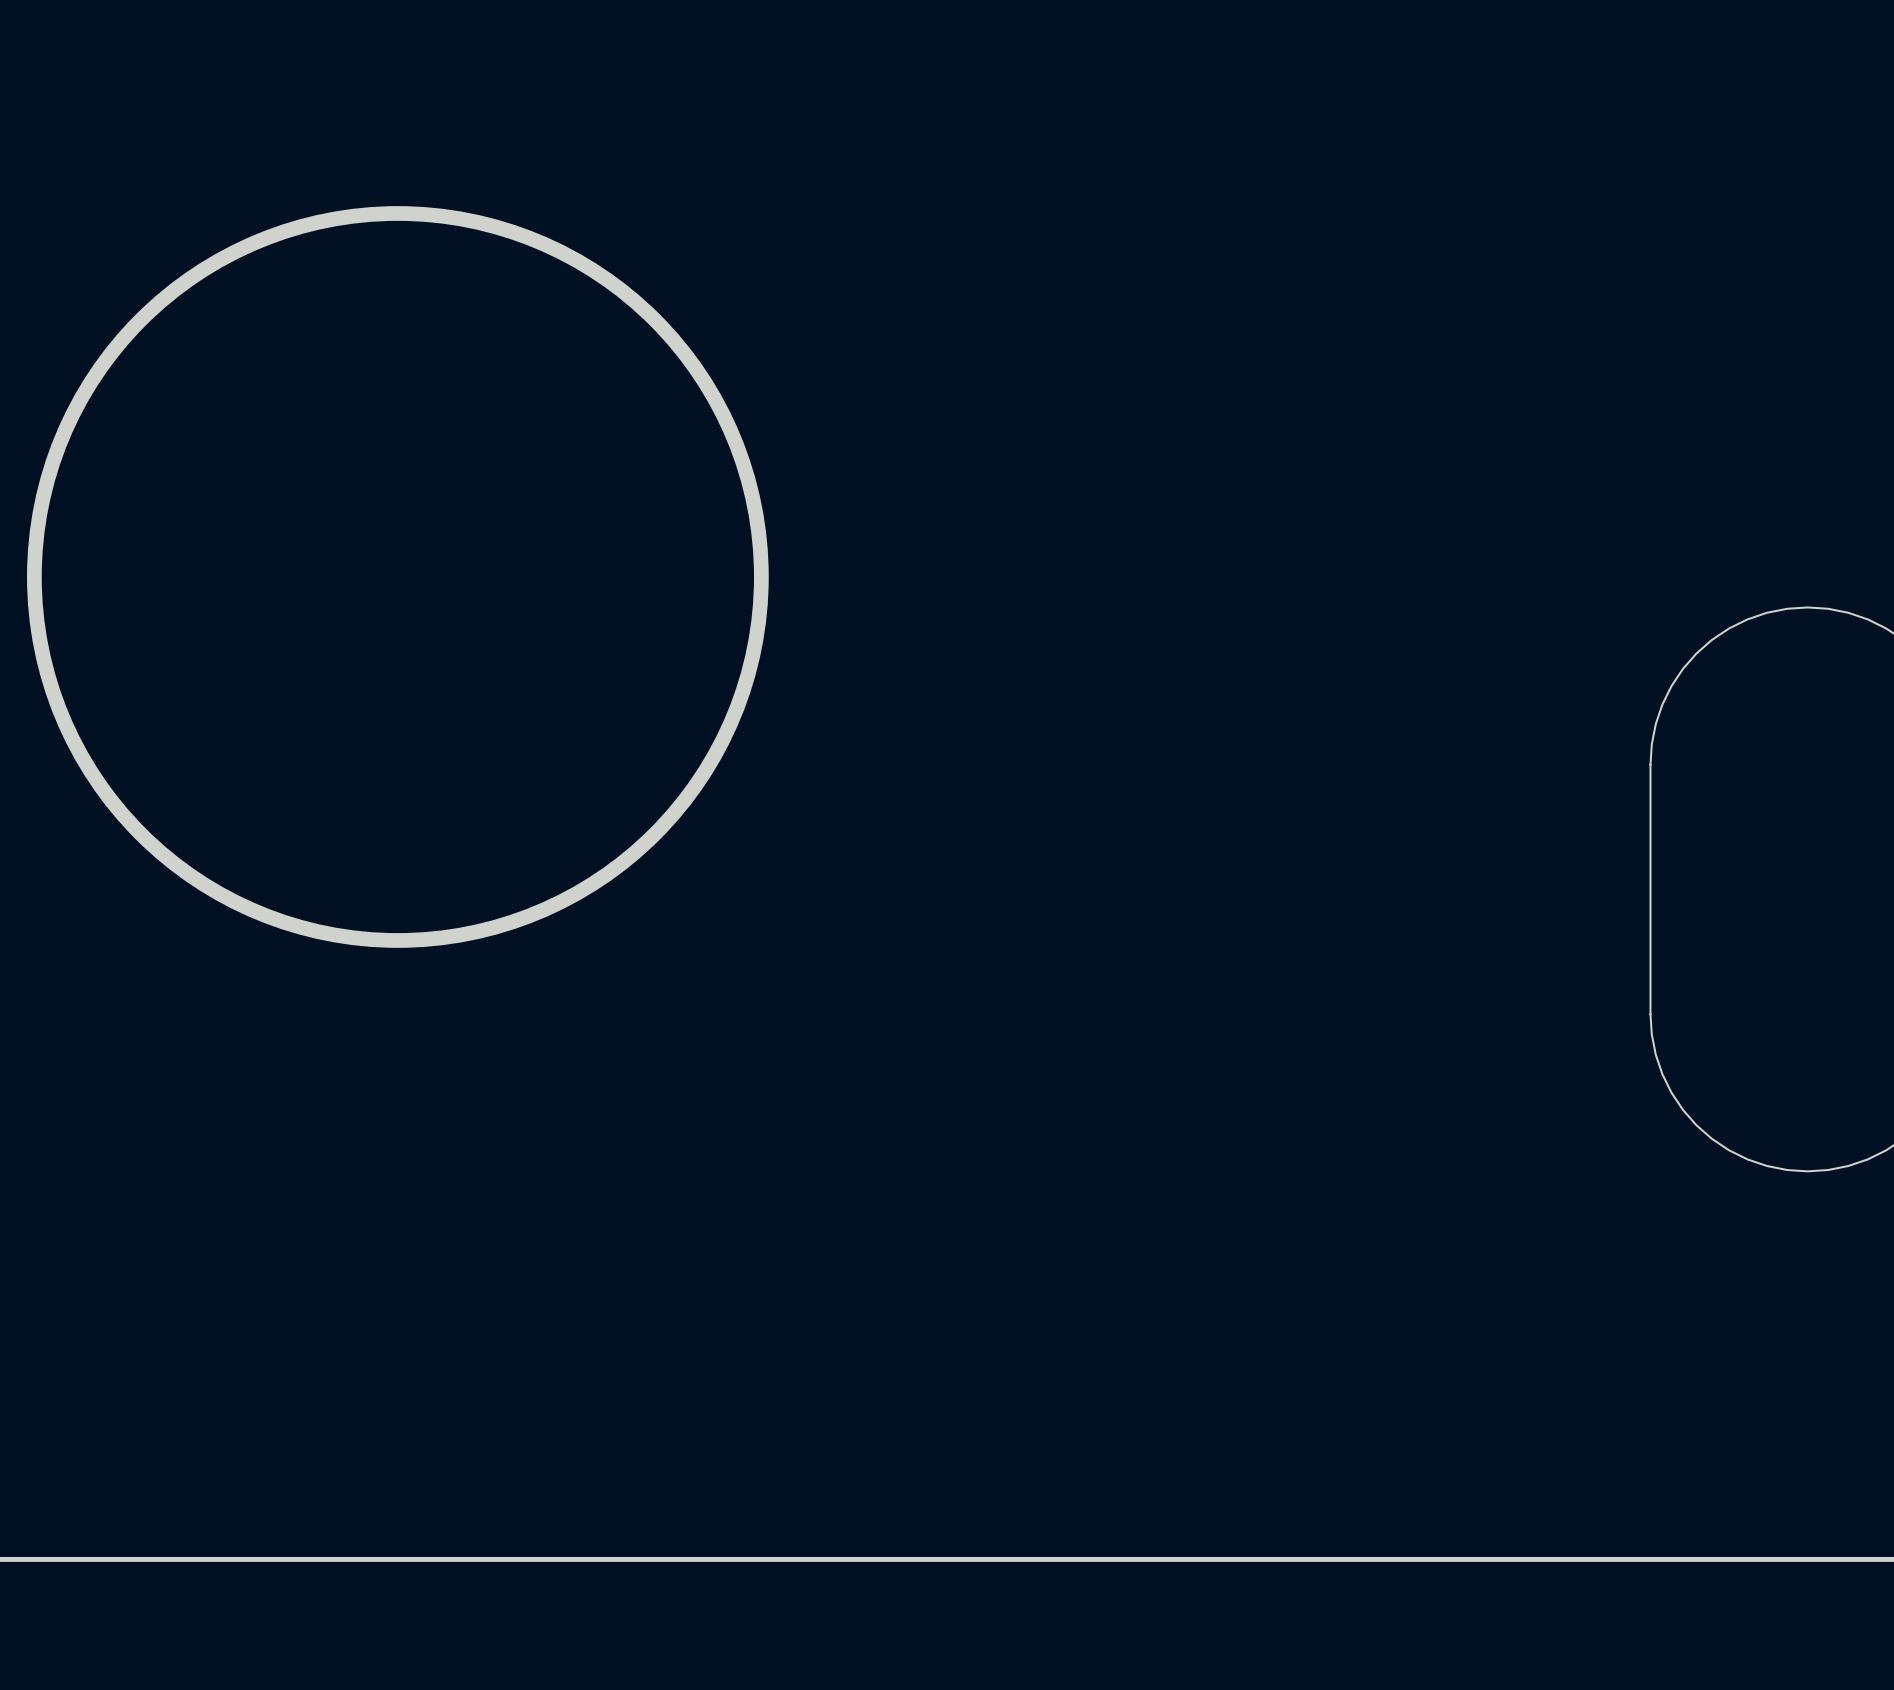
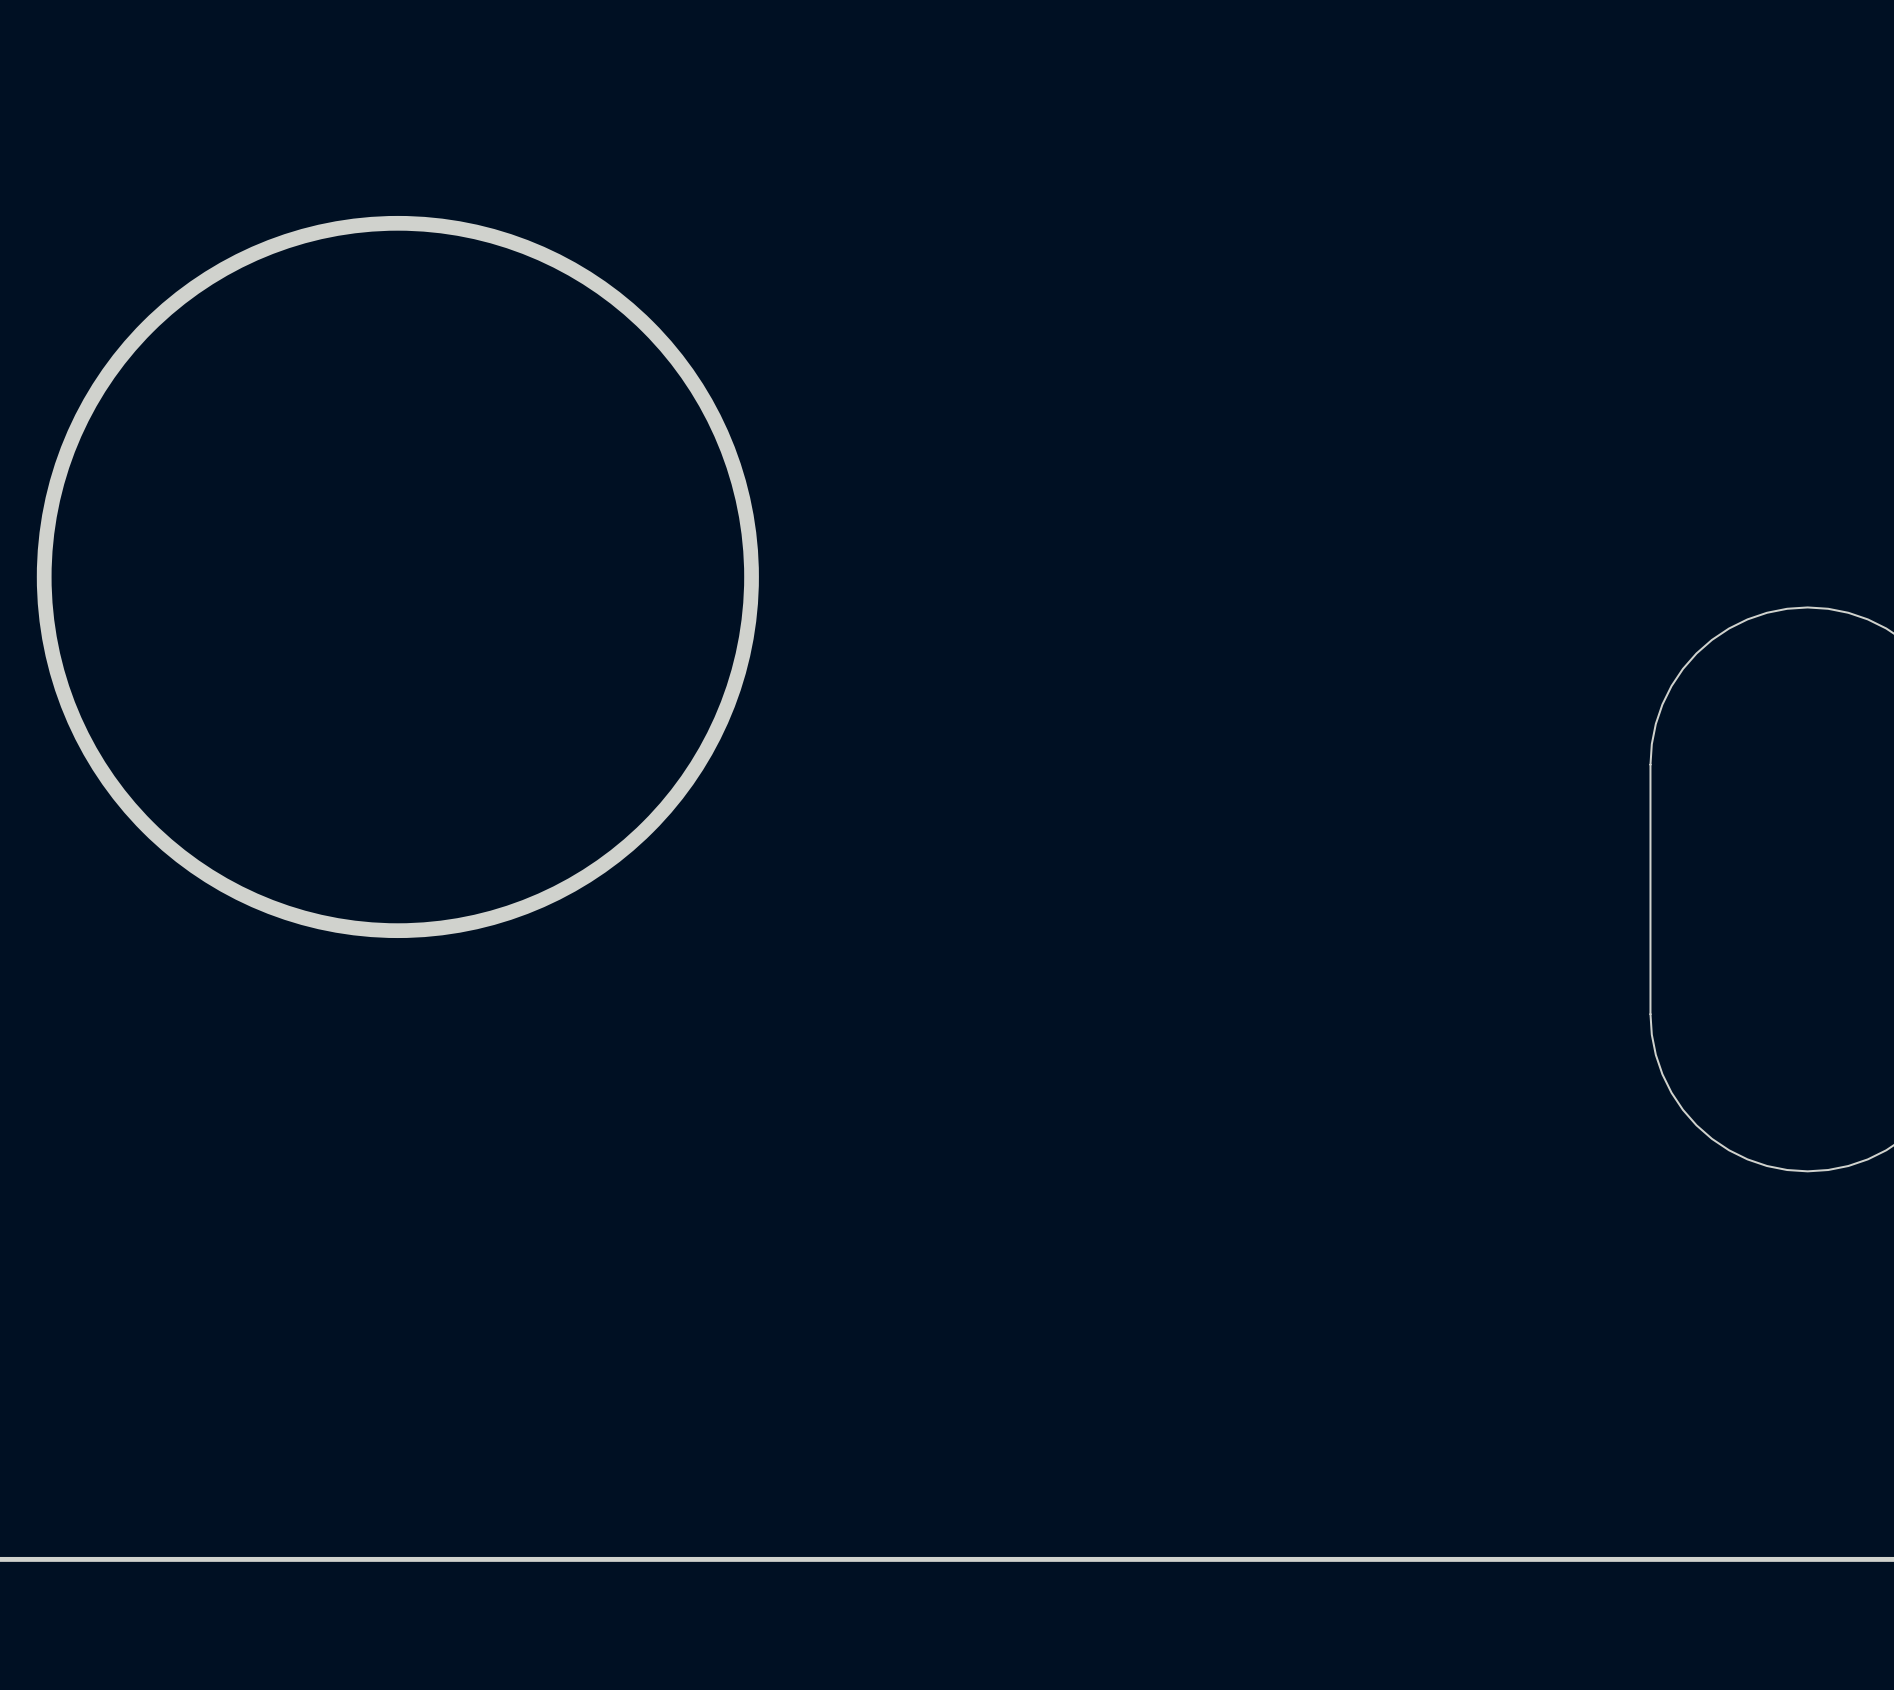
round board edge size: [27, 206, 769, 948] -> [36, 215, 759, 939]

